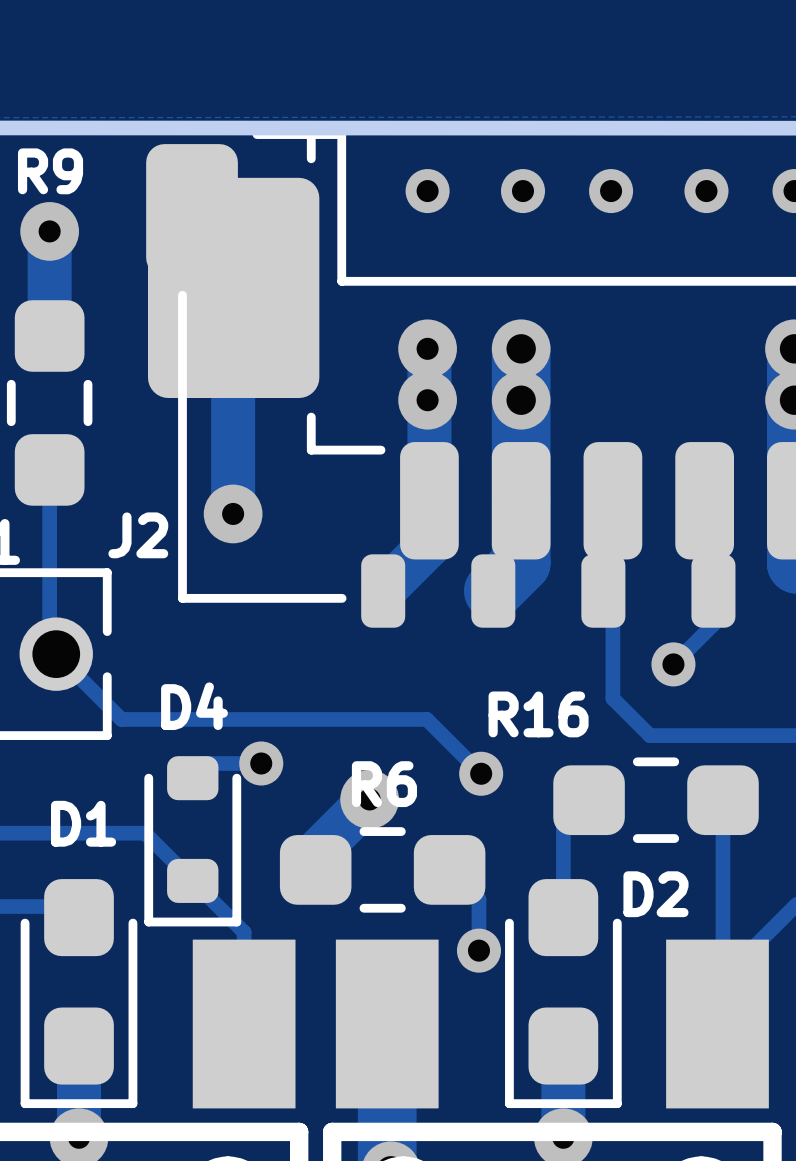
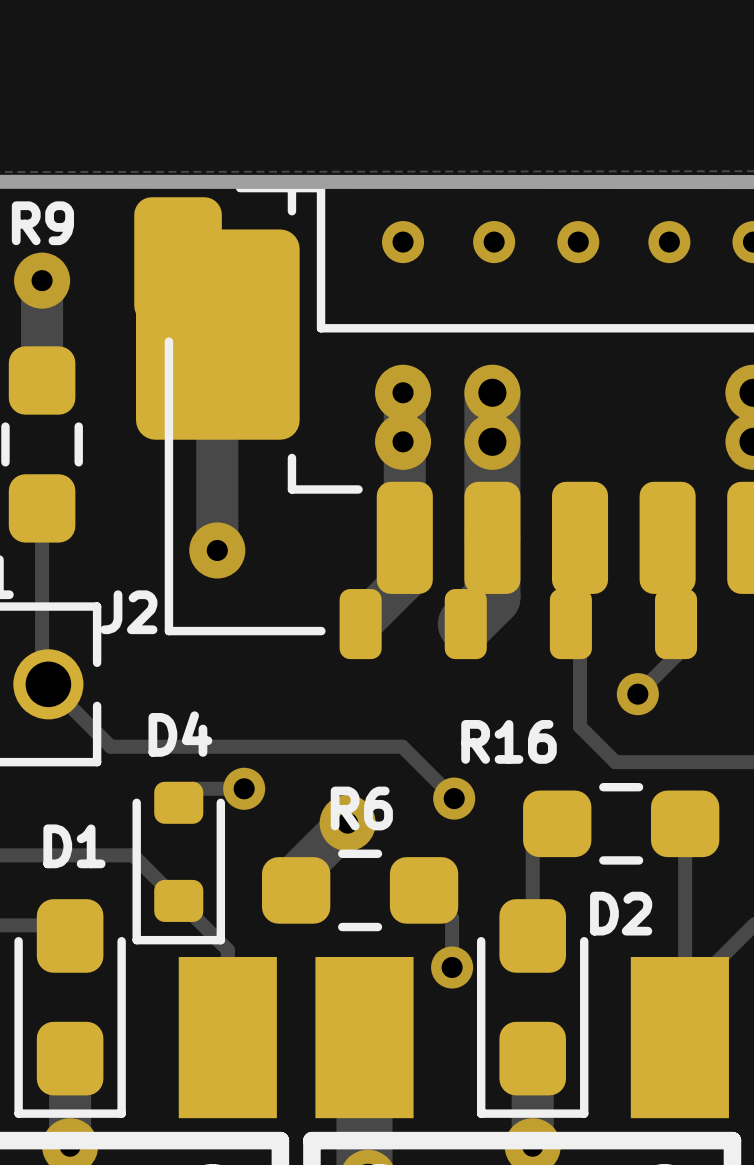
J2 name position: J2 (138, 535) -> J2 (128, 612)

